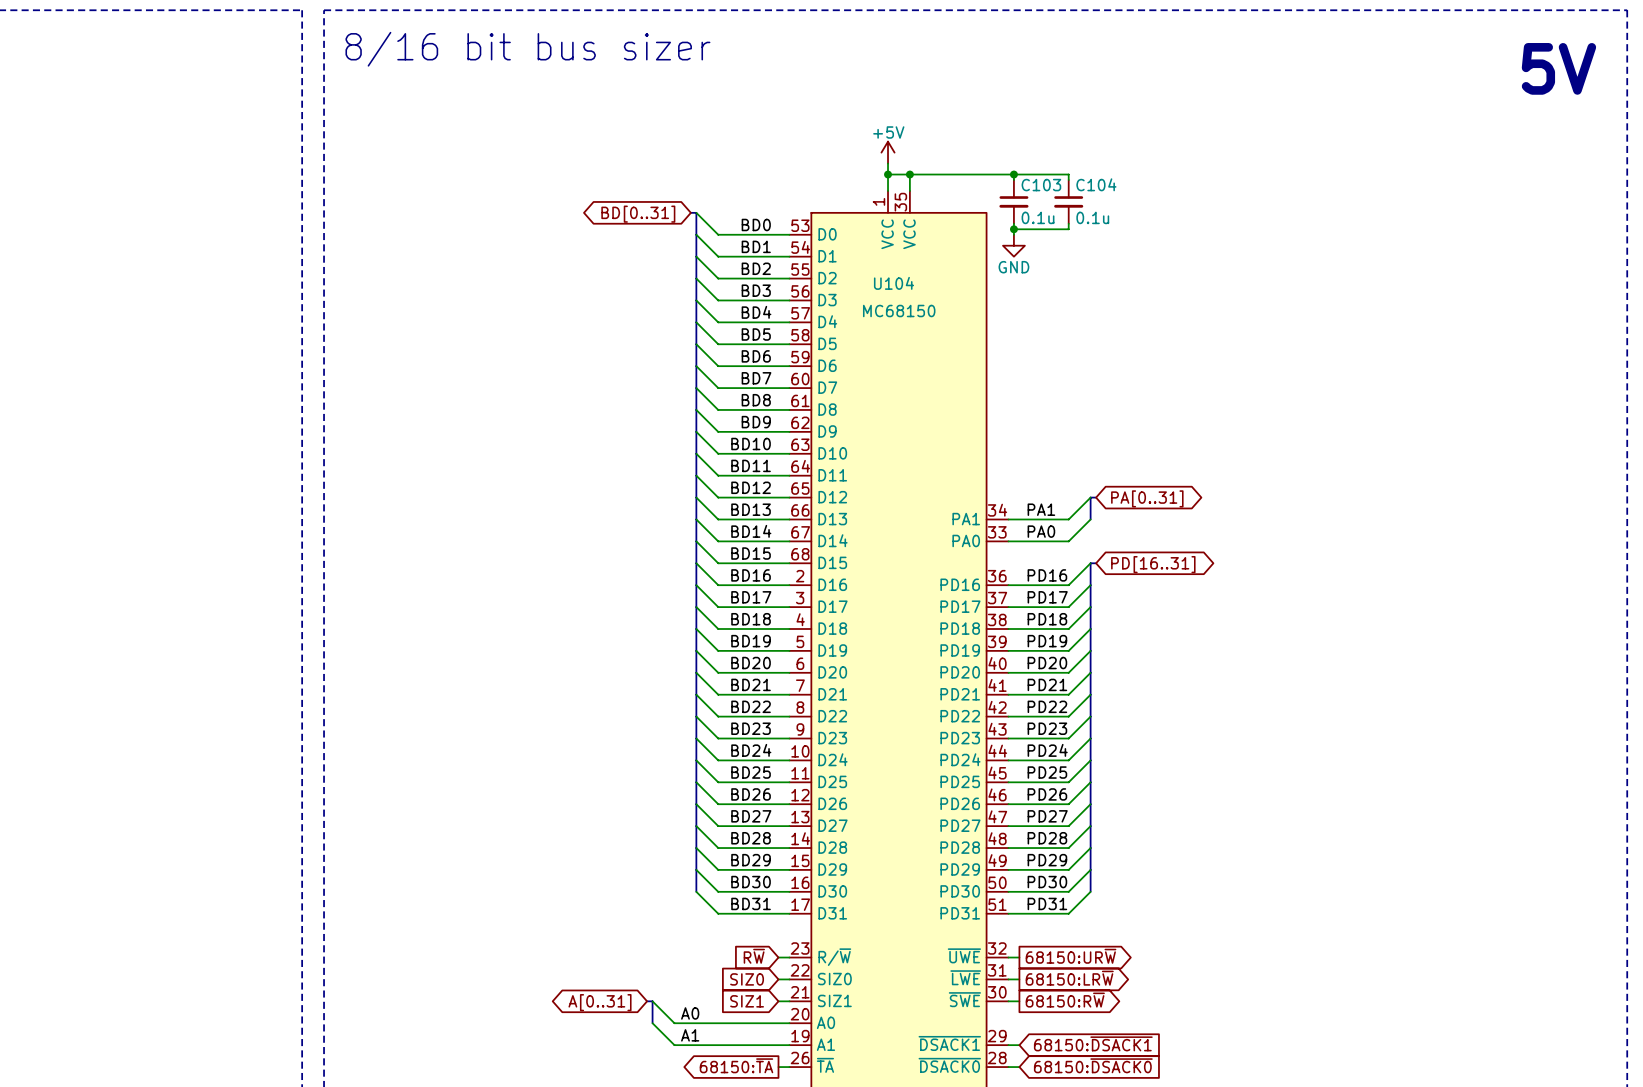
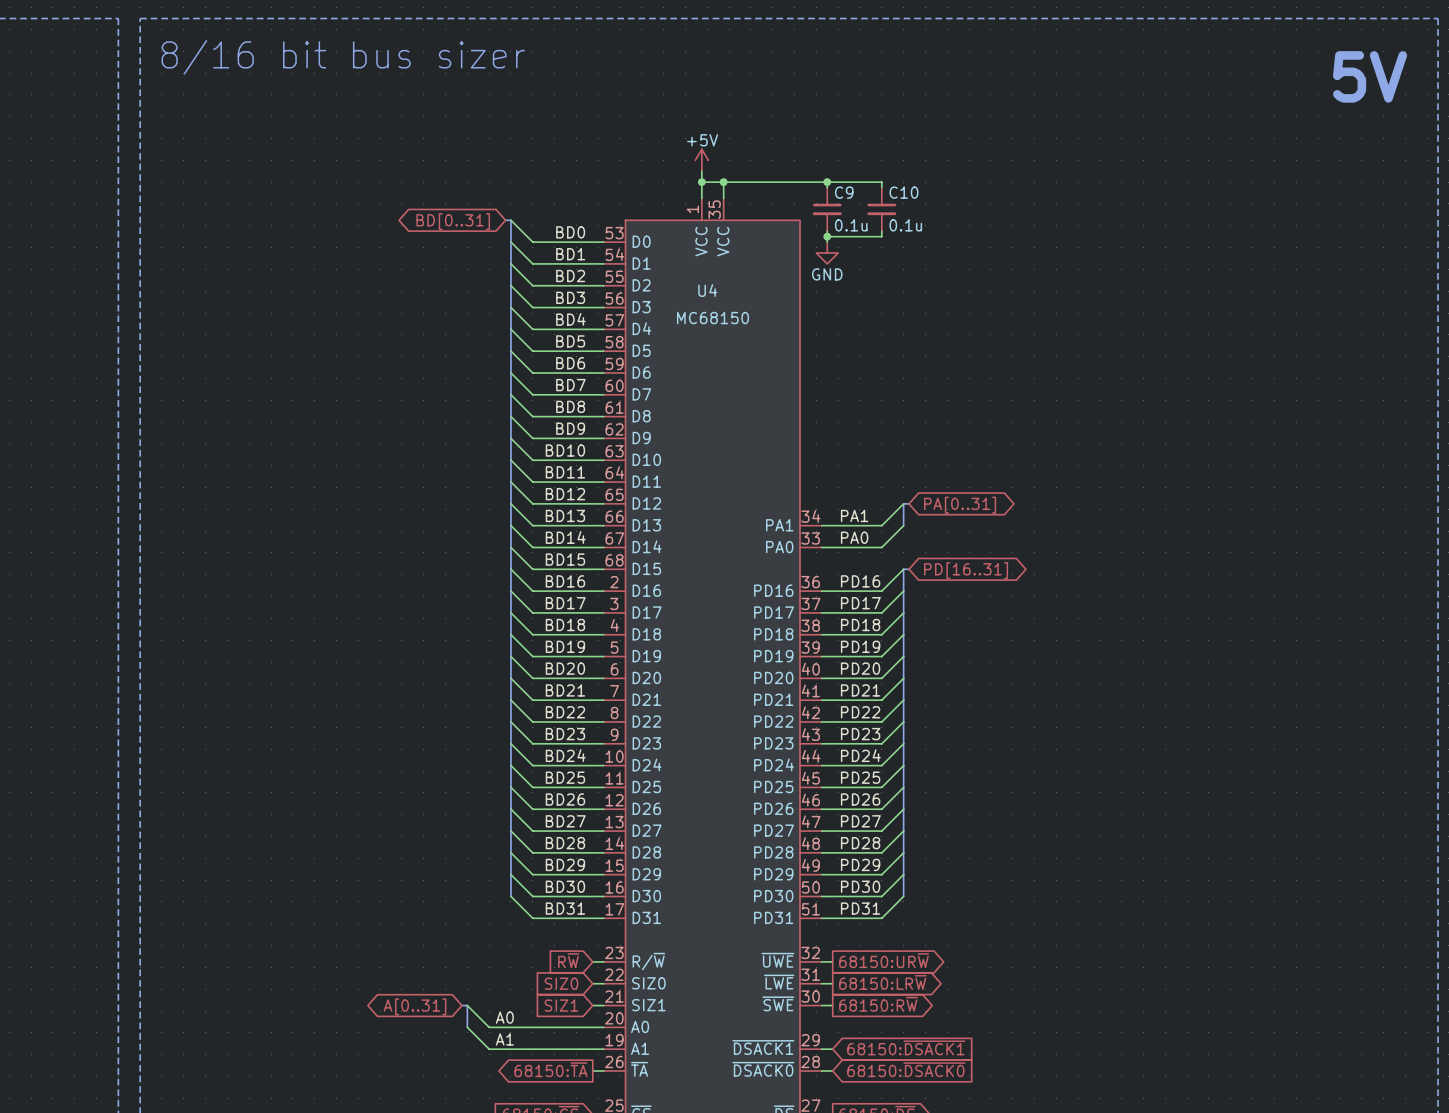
C104 name: C104 (1096, 184) -> C10 (903, 192)
C103 name: C103 (1041, 185) -> C9 (844, 192)
U104 name: U104 (894, 283) -> U4 (707, 290)

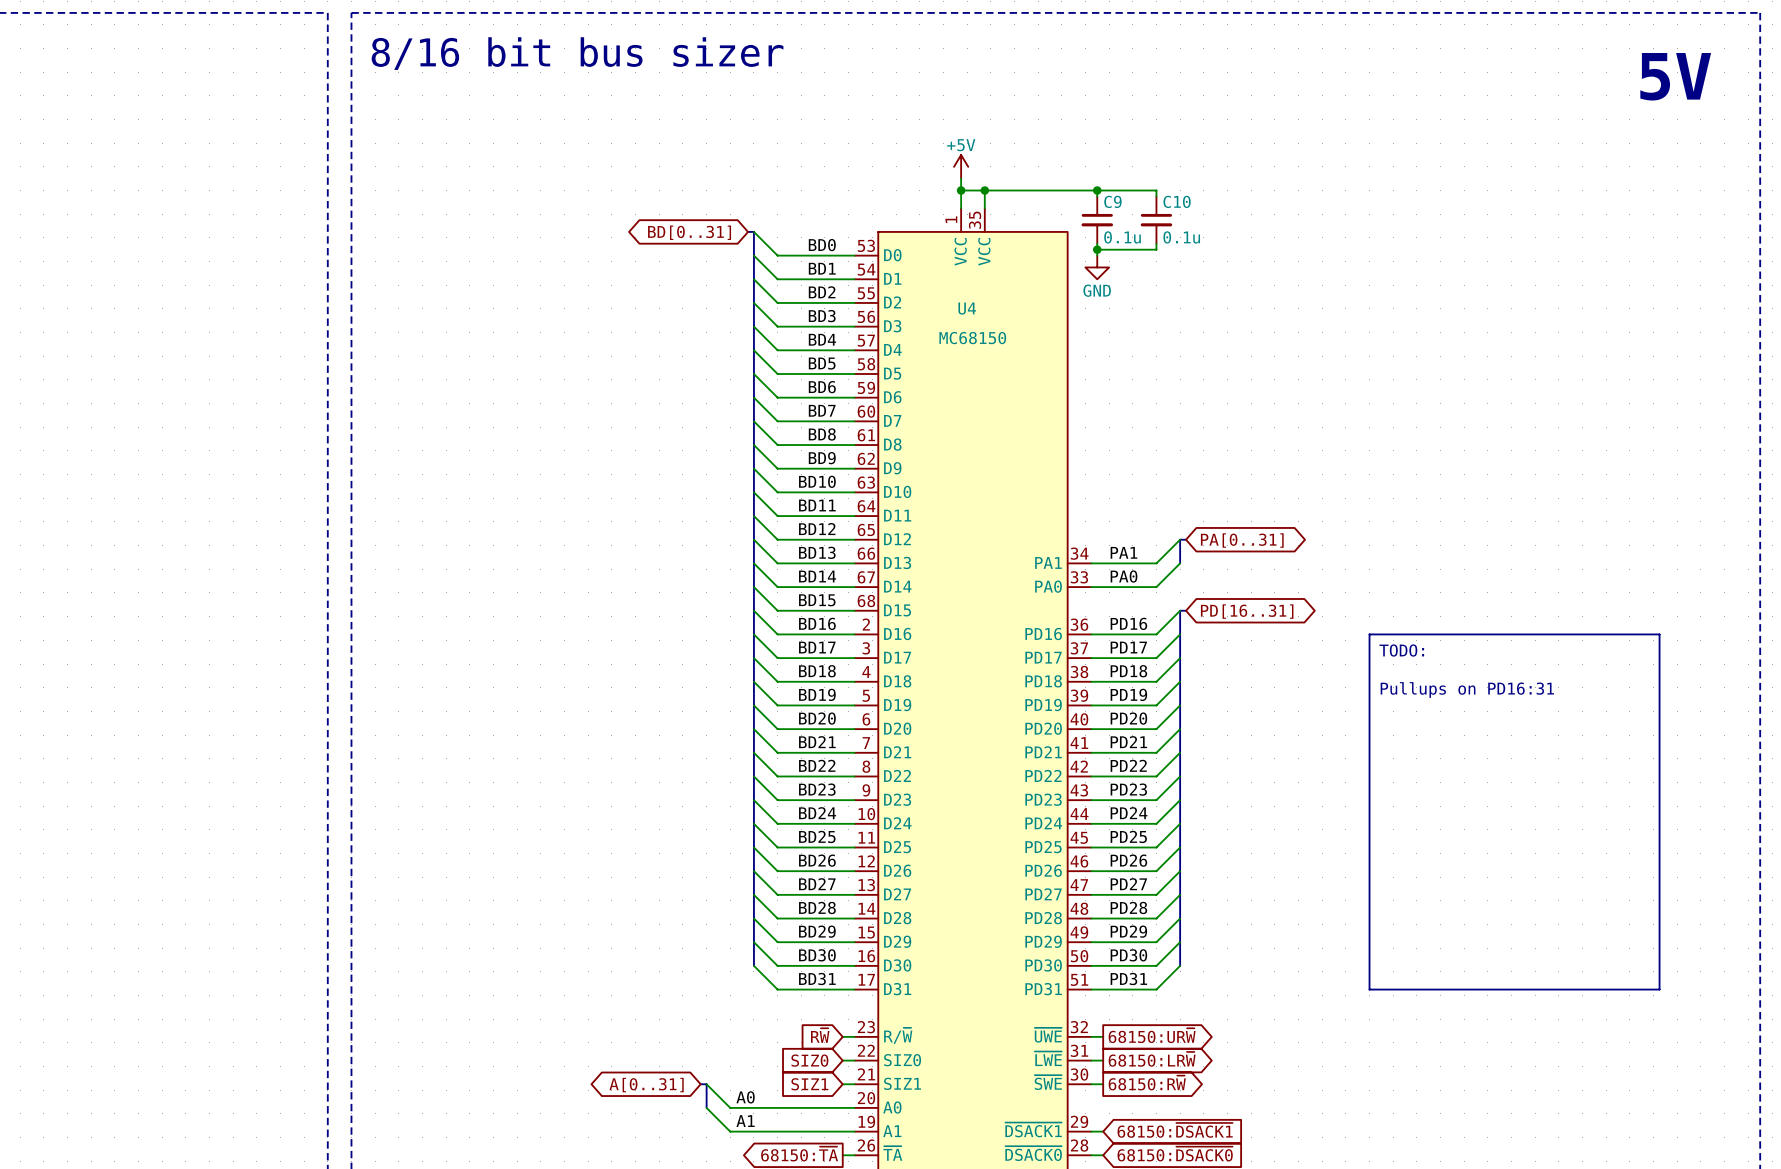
line: none -> (1369, 634) (1659, 634) (1659, 989) (1369, 989) (1369, 634)
text: none -> TODO: (1401, 650)
text: none -> Pullups on PD16:31 (1467, 690)

